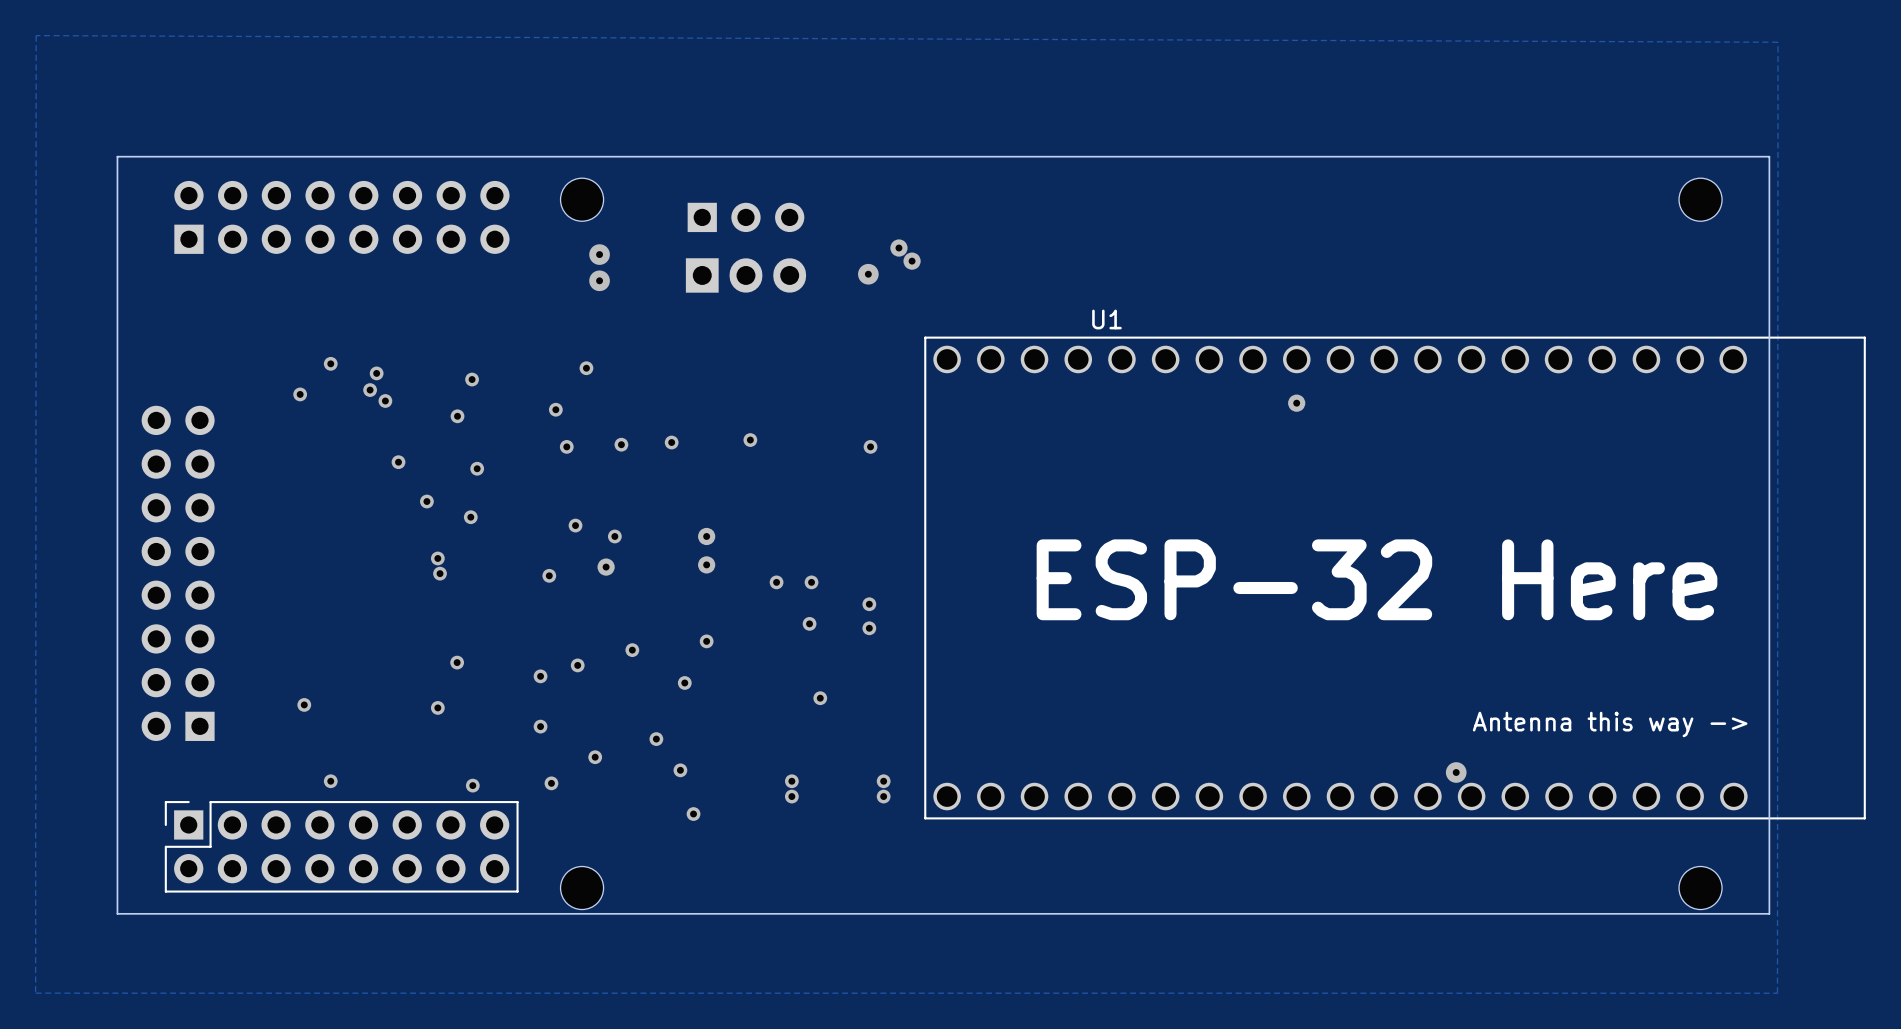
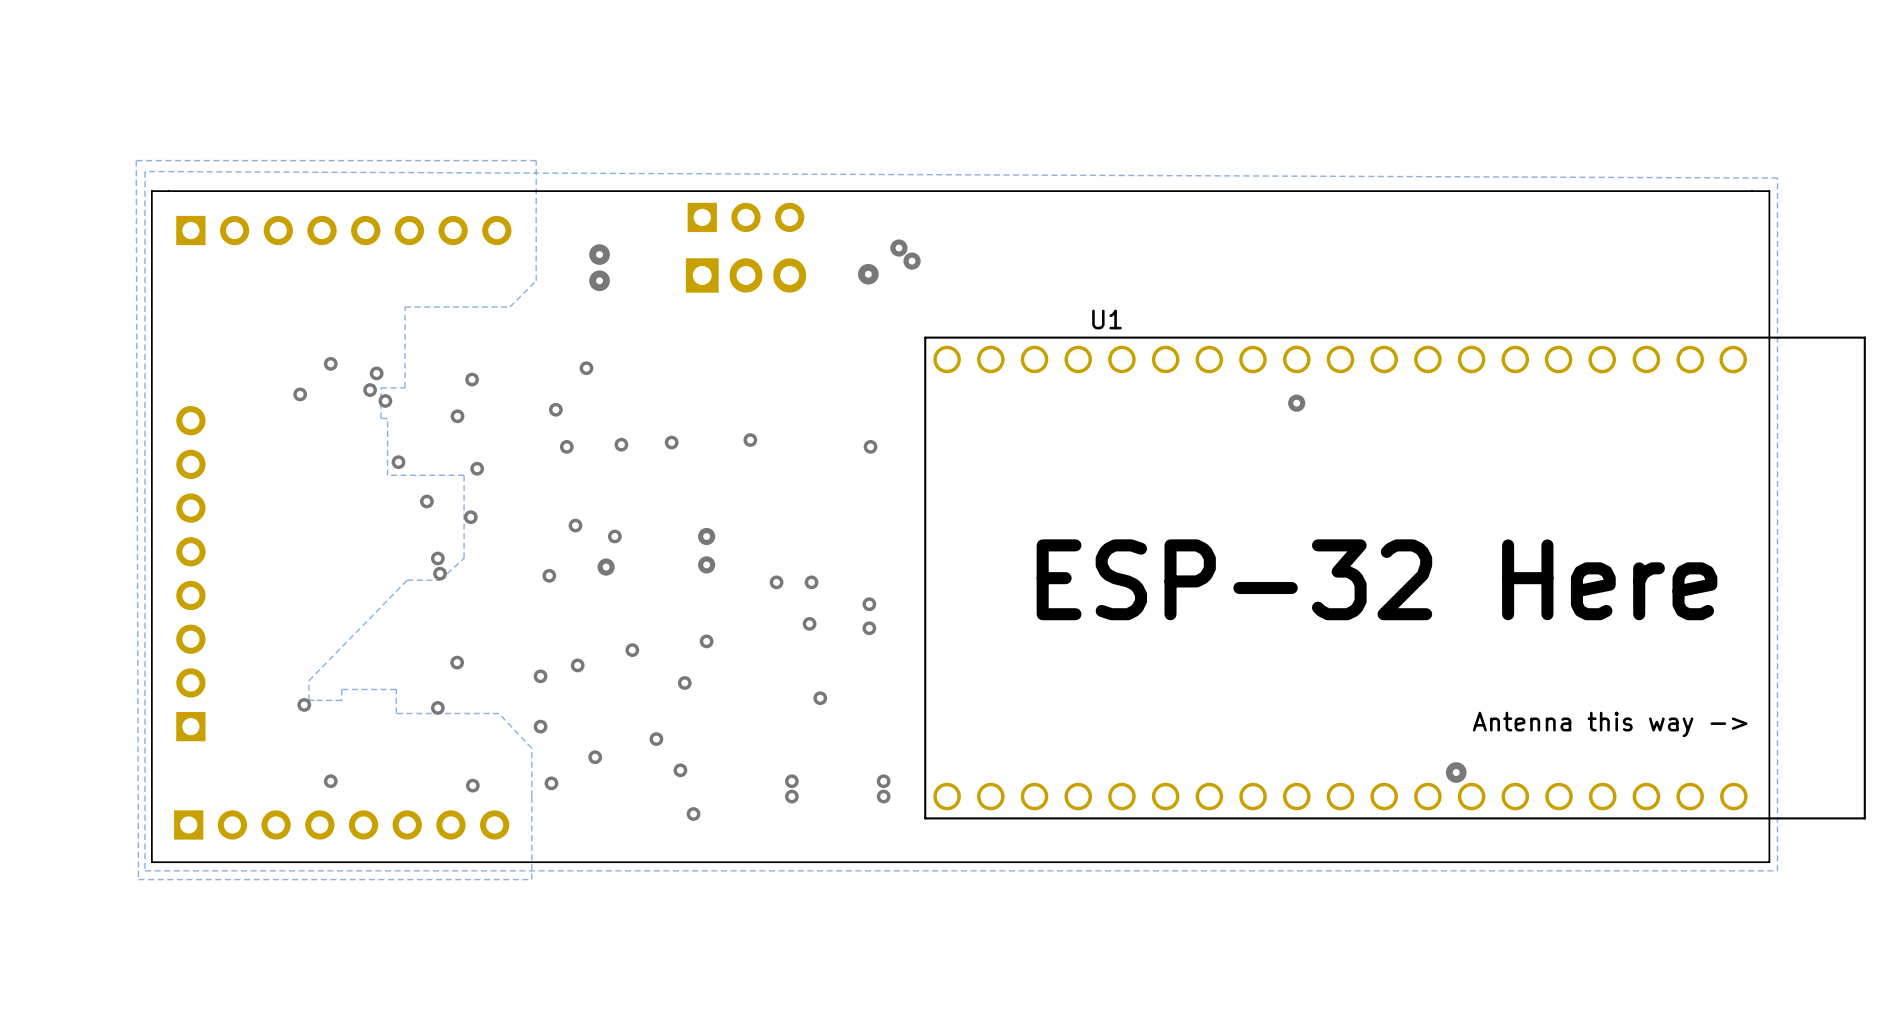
zone outline: (36, 35) (1778, 42) (1777, 993) (35, 993) (36, 35) -> (145, 171) (1777, 178) (1777, 870) (145, 870) (145, 171)
zone outline: none -> (536, 160) (536, 280) (509, 307) (405, 307) (405, 387) (381, 387) (381, 418) (387, 418) (387, 475) (464, 475) (464, 558) (440, 580) (407, 580) (308, 680) (308, 700) (341, 700) (341, 689) (396, 689) (396, 713) (499, 713) (531, 748) (531, 879) (138, 879) (136, 160) (536, 160)
part footprint: [174, 180, 510, 254] -> [176, 215, 512, 246]
board edge: (1769, 191) (1769, 156) (117, 156) (117, 913) (1769, 913) (1769, 862) -> (1769, 191) (151, 191) (151, 862) (1769, 862)
part: (582, 199) -> none
part: (1700, 199) -> none
part footprint: [141, 405, 215, 741] -> [176, 406, 206, 742]
part: (341, 846) -> none
part: (582, 888) -> none
part: (1700, 888) -> none

